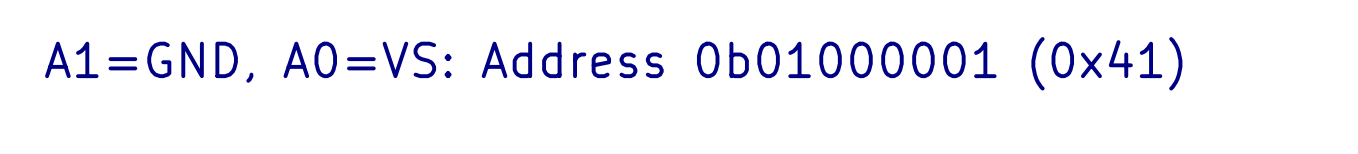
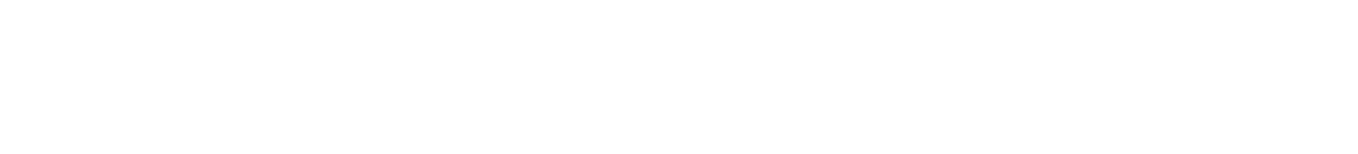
text: A1=GND, A0=VS: Address 0b01000001 (0x41) (613, 63) -> none

